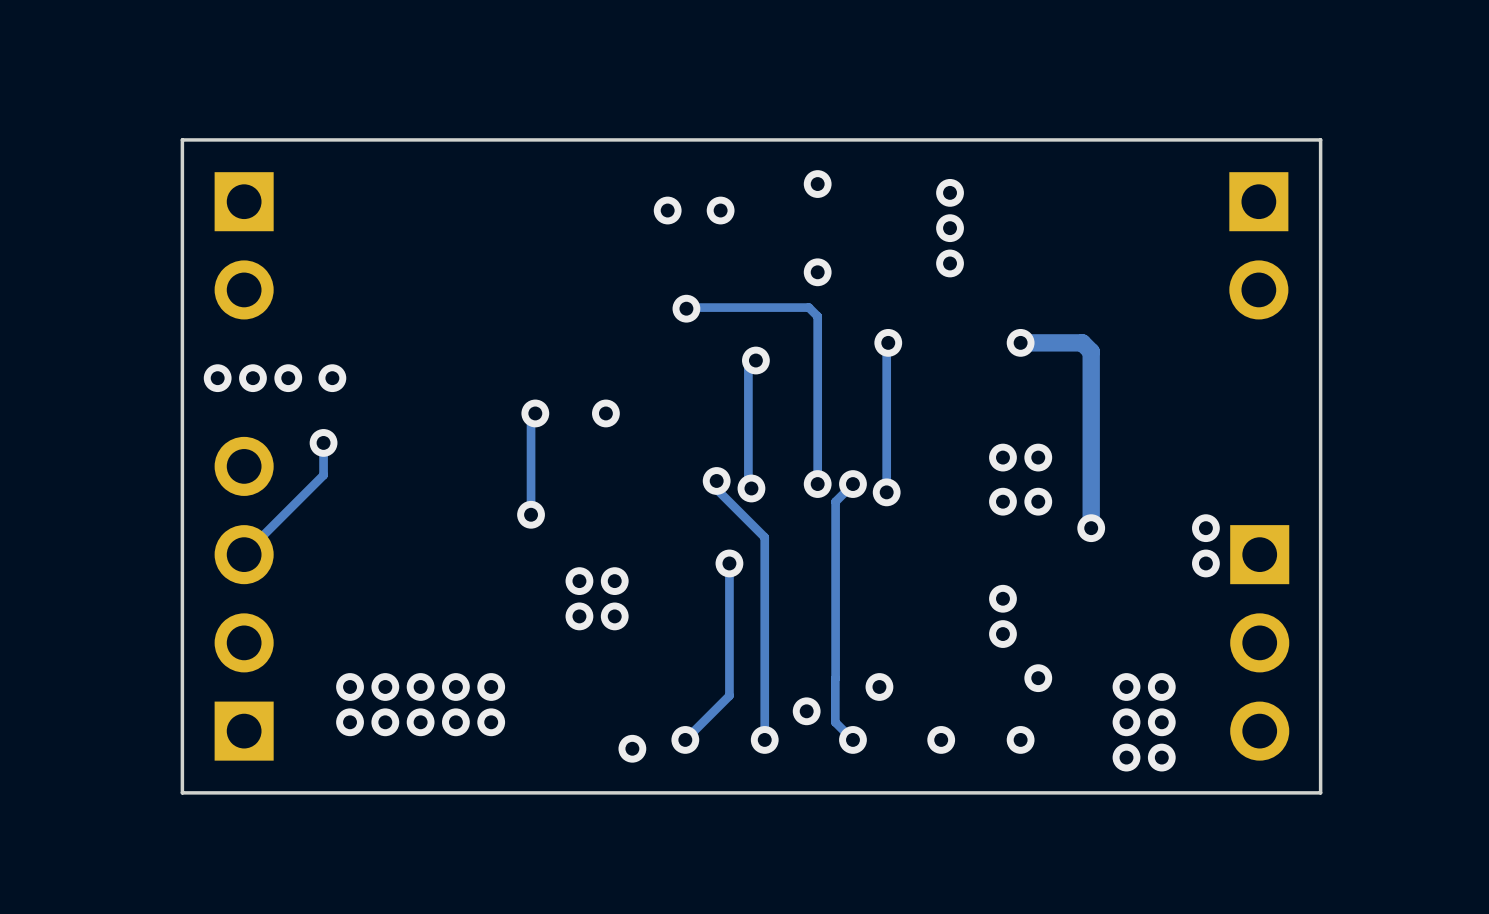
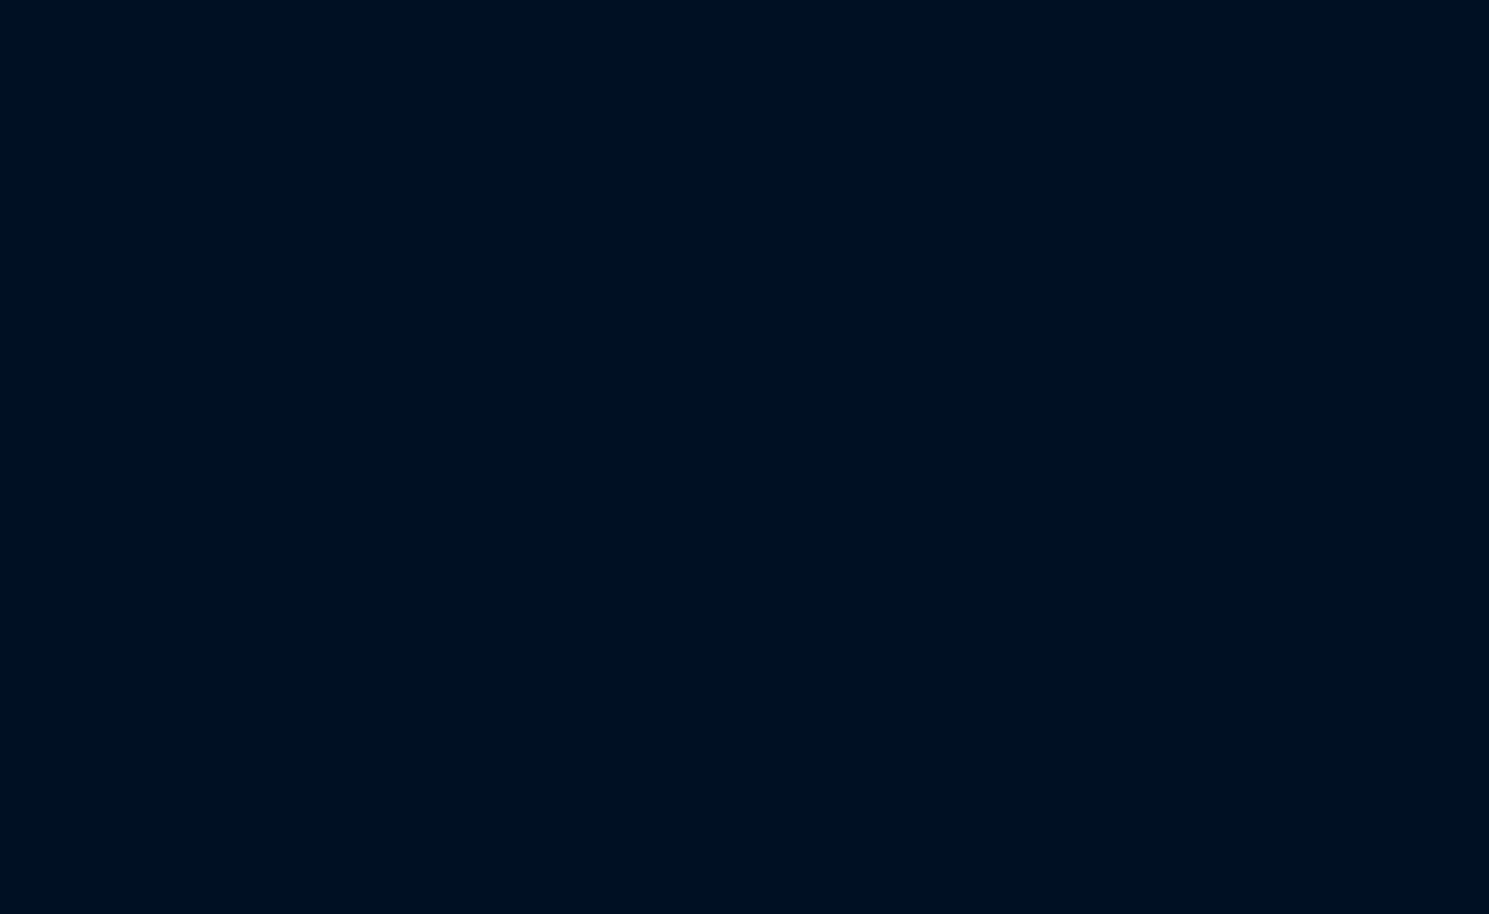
board edge: (1320, 139) (182, 139) (182, 792) (1320, 792) (1320, 139) -> none
via: (817, 184) -> none
via: (950, 192) -> none
via: (667, 210) -> none
via: (720, 210) -> none
via: (950, 228) -> none
part: (244, 245) -> none
part: (1258, 245) -> none
via: (950, 263) -> none
via: (817, 272) -> none
track: (686, 308) (808, 307) (817, 316) (817, 484) -> none
via: (686, 308) -> none
track: (888, 342) (886, 344) (886, 492) -> none
via: (888, 342) -> none
track: (1020, 342) (1082, 342) (1091, 351) (1091, 528) -> none
via: (1020, 342) -> none
track: (755, 360) (748, 368) (748, 485) (751, 488) -> none
via: (755, 360) -> none
via: (217, 378) -> none
via: (252, 378) -> none
via: (288, 378) -> none
via: (332, 378) -> none
track: (535, 413) (531, 417) (531, 514) -> none
via: (535, 413) -> none
via: (605, 413) -> none
track: (323, 442) (323, 475) (244, 554) -> none
via: (323, 442) -> none
via: (1002, 457) -> none
via: (1038, 457) -> none
via: (716, 480) -> none
track: (714, 483) (716, 480) (716, 489) (764, 537) (764, 739) -> none
via: (817, 484) -> none
track: (852, 484) (835, 501) (835, 678) -> none
via: (852, 484) -> none
via: (751, 488) -> none
via: (886, 492) -> none
via: (1002, 501) -> none
via: (1038, 501) -> none
via: (531, 514) -> none
via: (1091, 528) -> none
via: (1205, 528) -> none
track: (729, 563) (729, 695) (685, 739) -> none
via: (729, 563) -> none
via: (1205, 563) -> none
via: (579, 581) -> none
via: (614, 581) -> none
part: (244, 598) -> none
via: (1002, 598) -> none
via: (579, 616) -> none
via: (614, 616) -> none
via: (1002, 634) -> none
part: (1259, 642) -> none
track: (835, 678) (835, 722) (852, 739) -> none
via: (1038, 678) -> none
via: (350, 686) -> none
via: (385, 686) -> none
via: (420, 686) -> none
via: (455, 686) -> none
via: (491, 686) -> none
via: (879, 686) -> none
via: (1126, 686) -> none
via: (1161, 686) -> none
via: (806, 711) -> none
via: (350, 722) -> none
via: (385, 722) -> none
via: (420, 722) -> none
via: (455, 722) -> none
via: (491, 722) -> none
via: (1126, 722) -> none
via: (1161, 722) -> none
via: (685, 739) -> none
via: (764, 739) -> none
via: (852, 739) -> none
via: (941, 739) -> none
via: (1020, 739) -> none
via: (632, 748) -> none
via: (1126, 757) -> none
via: (1161, 757) -> none

